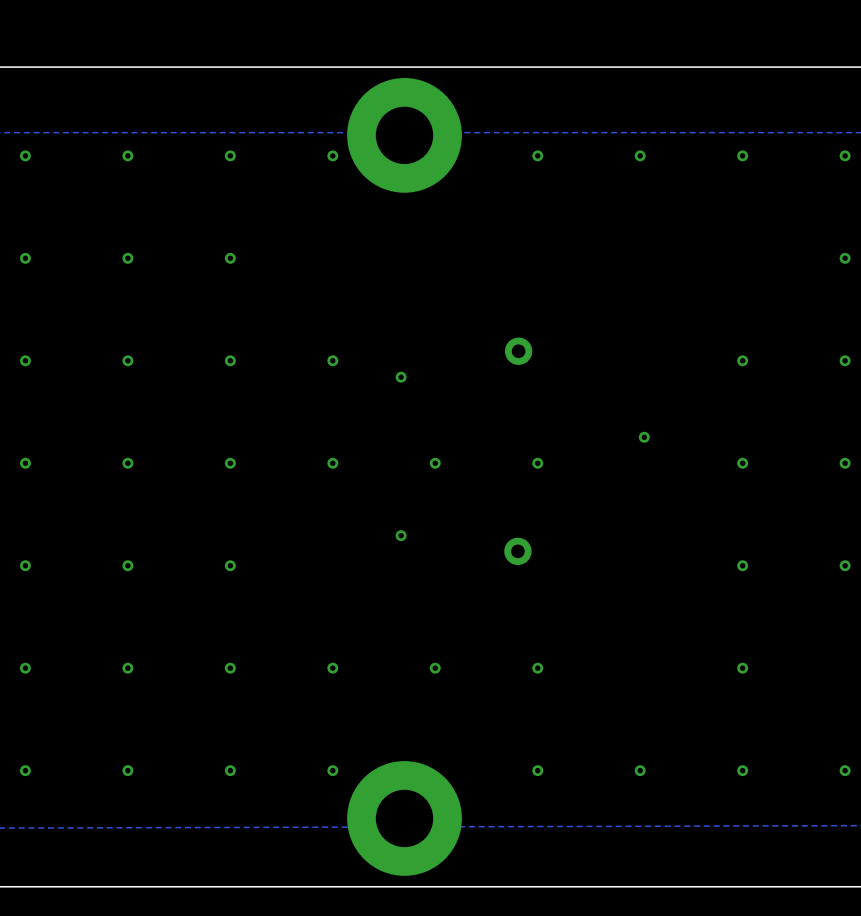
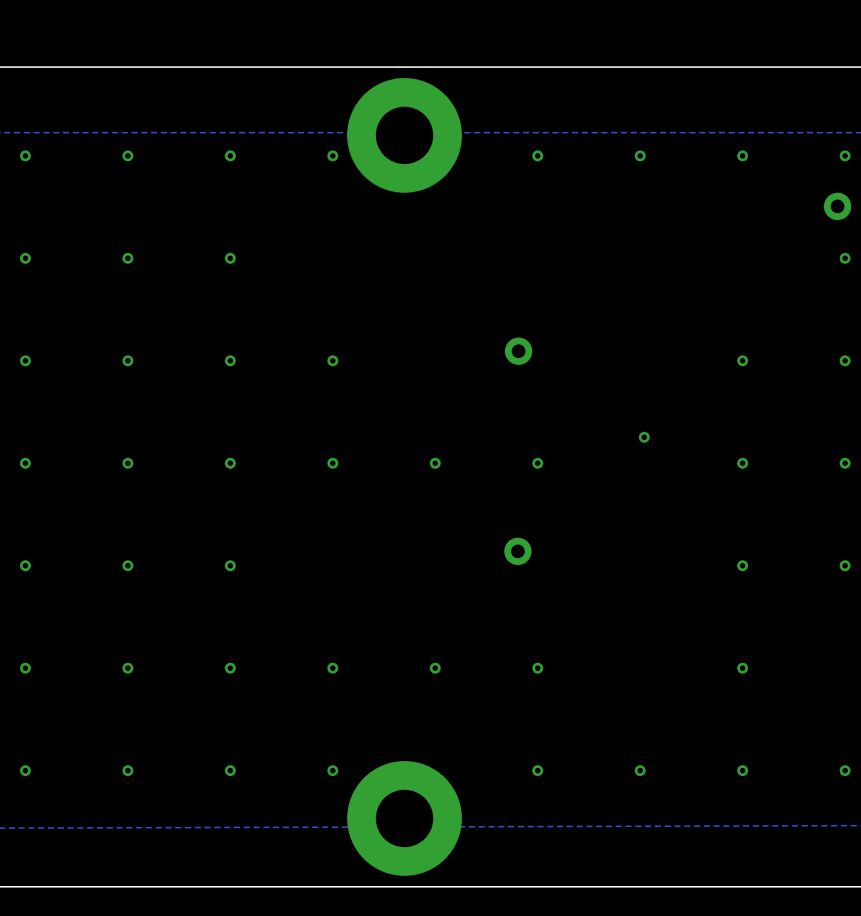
part: none -> (837, 206)
via: (401, 377) -> none
via: (401, 535) -> none

